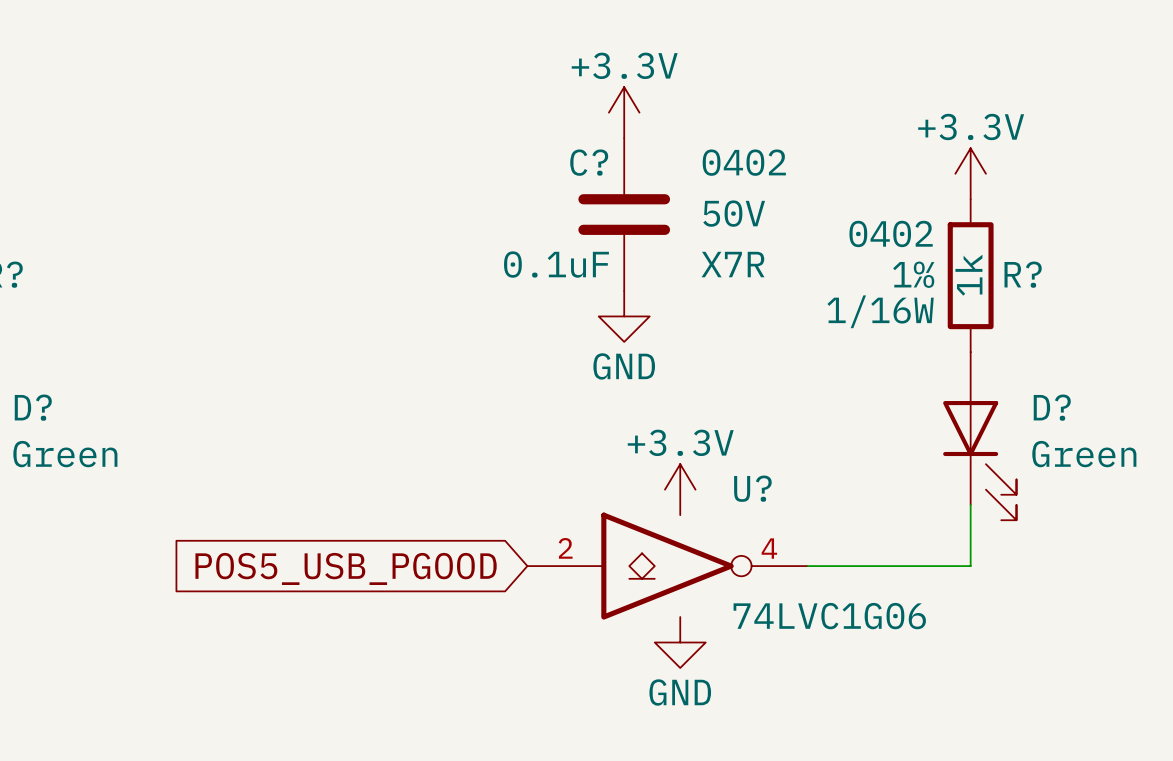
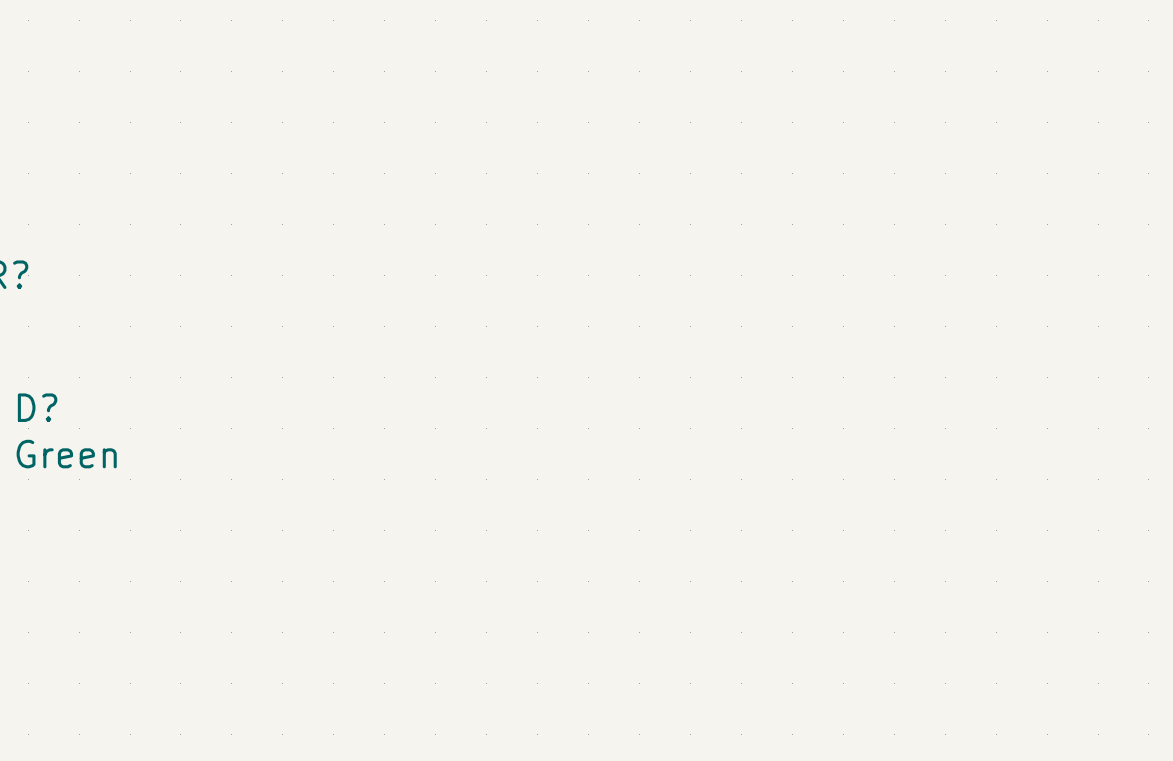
power symbol: +3.3V (624, 112) -> none
power symbol: +3.3V (970, 173) -> none
C?: 0.1uF (624, 214) -> none
R?: 1k (970, 275) -> none
power symbol: GND (624, 316) -> none
D?: Green (979, 436) -> none
power symbol: +3.3V (680, 489) -> none
wire: (970, 504) (970, 566) (807, 566) -> none
U?: 74LVC1G06 (667, 566) -> none
global label: POS5_USB_PGOOD (346, 568) -> none
power symbol: GND (680, 642) -> none

